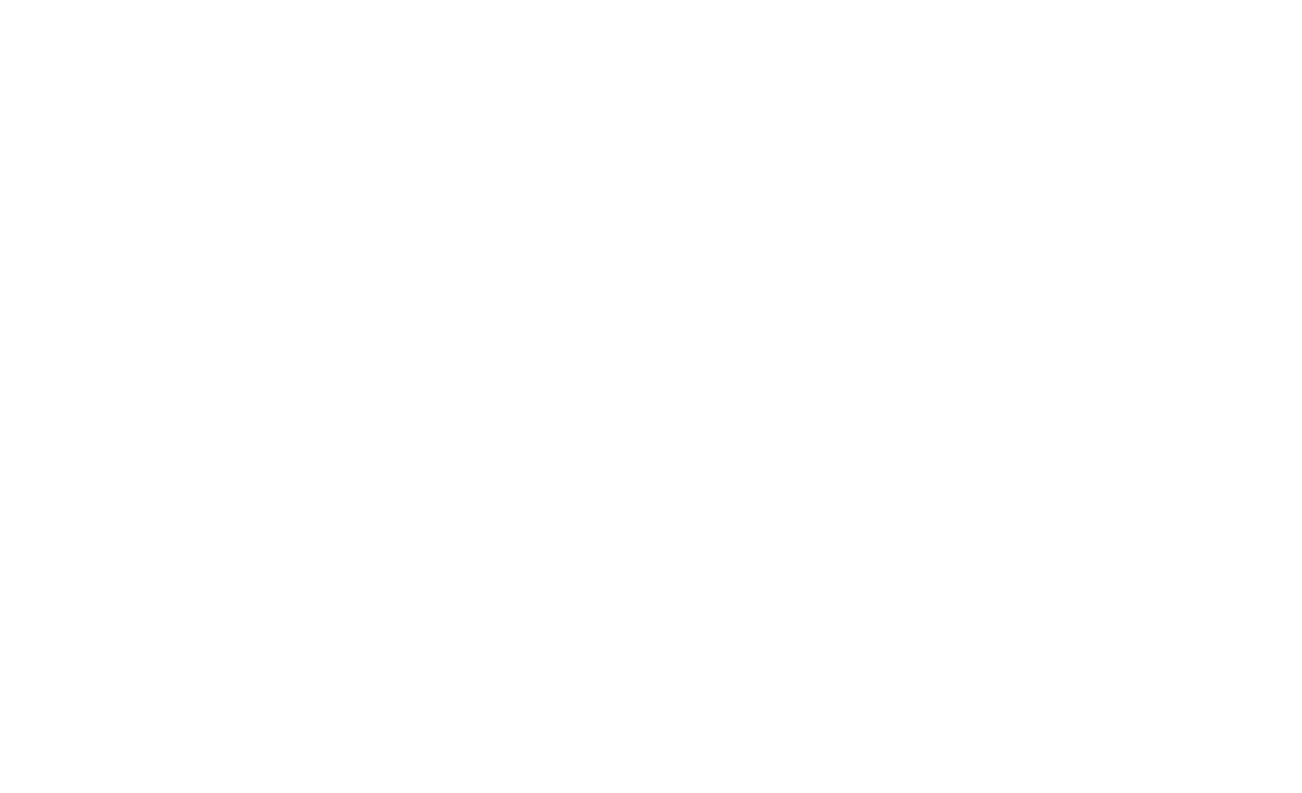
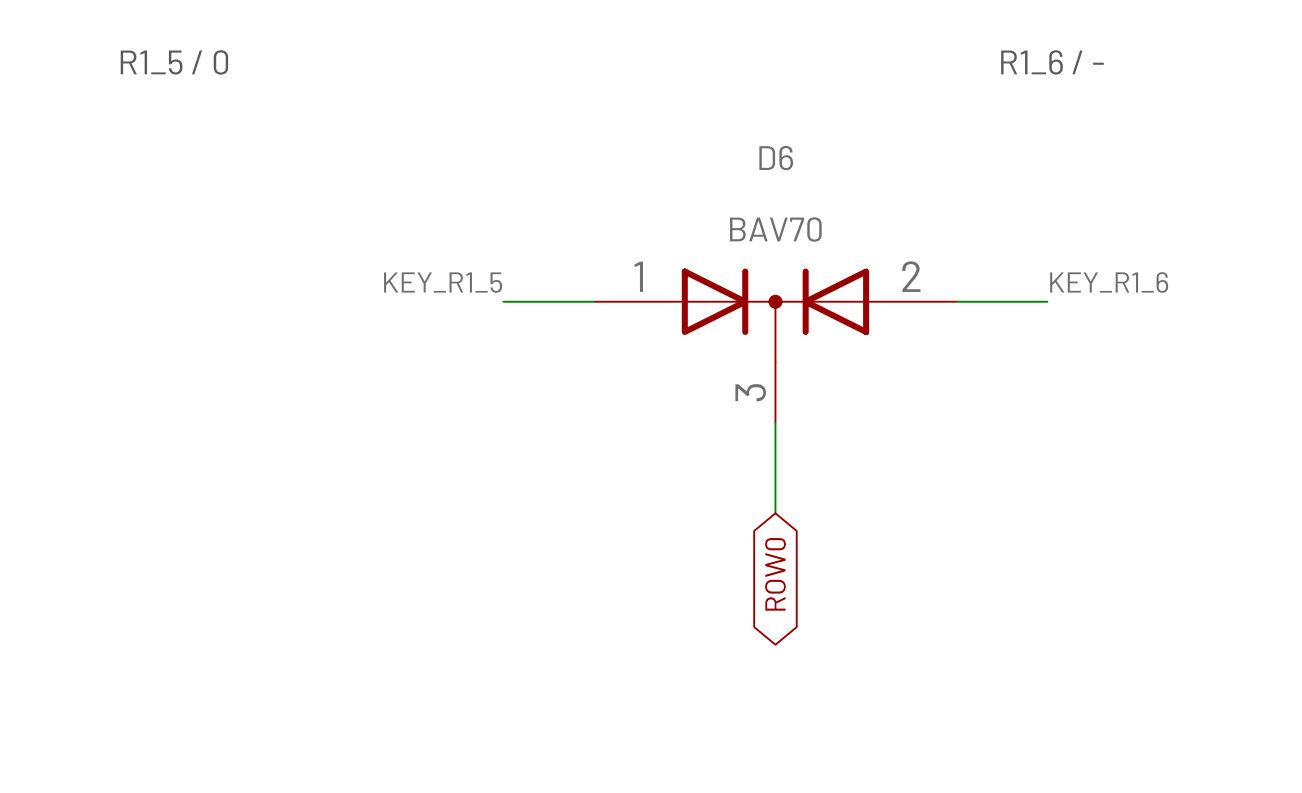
text: none -> R1_5 / 0 (174, 62)
text: none -> R1_6 / - (1052, 62)
label: none -> KEY_R1_5 (443, 282)
label: none -> KEY_R1_6 (1109, 282)
wire: none -> (503, 301) (594, 301)
wire: none -> (956, 301) (1047, 301)
D6: none -> BAV70 (775, 345)
wire: none -> (775, 422) (775, 513)
global label: none -> ROW0 (775, 574)

